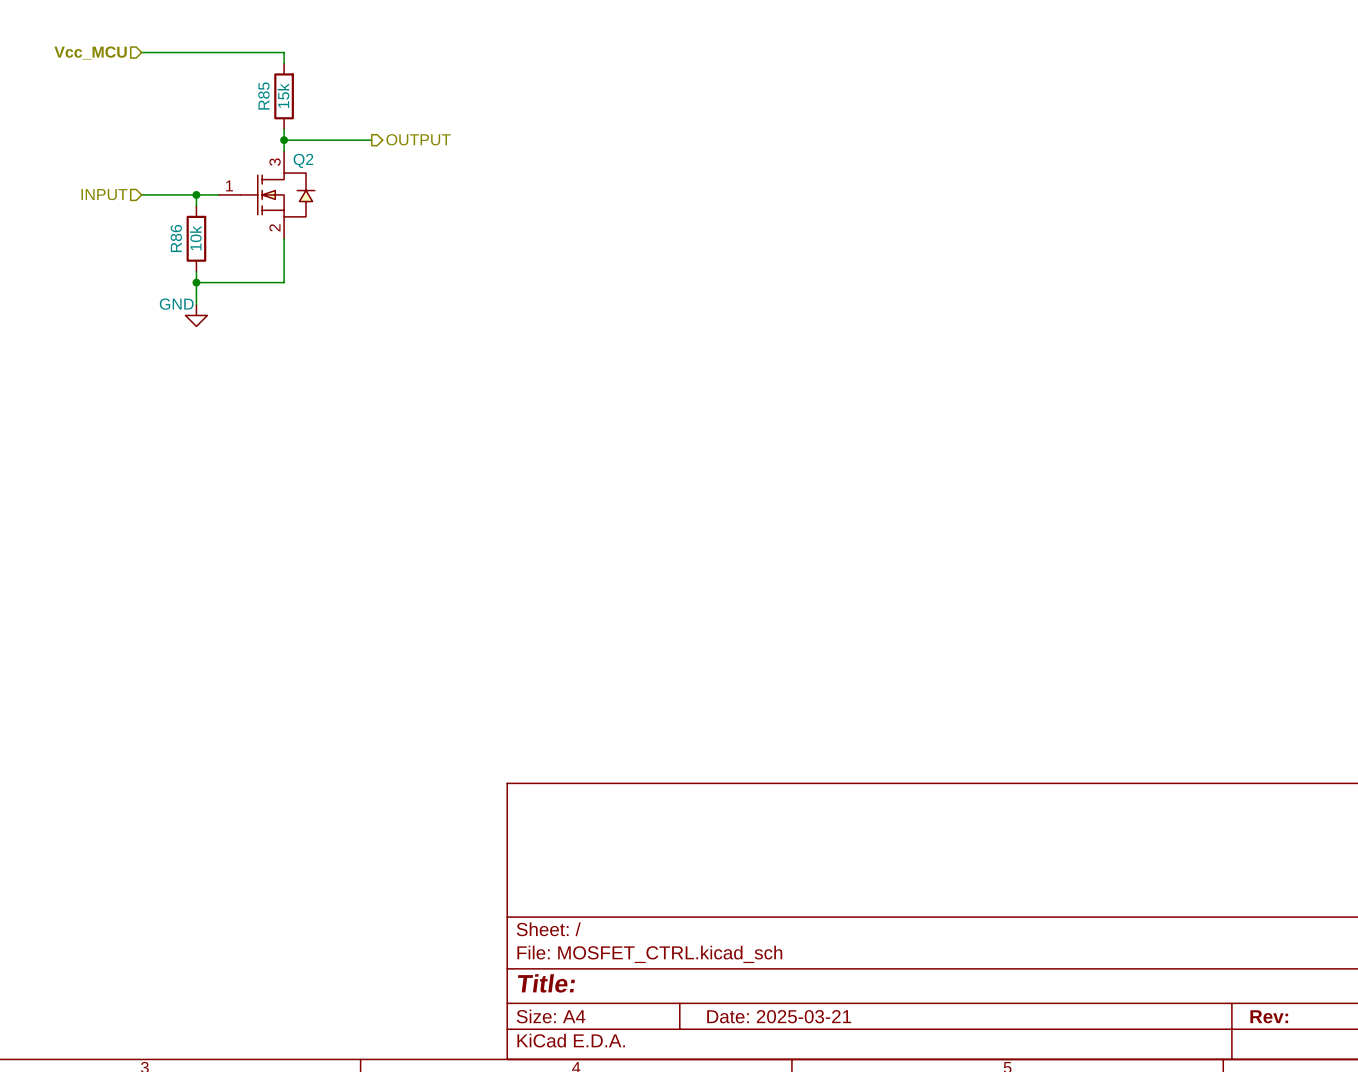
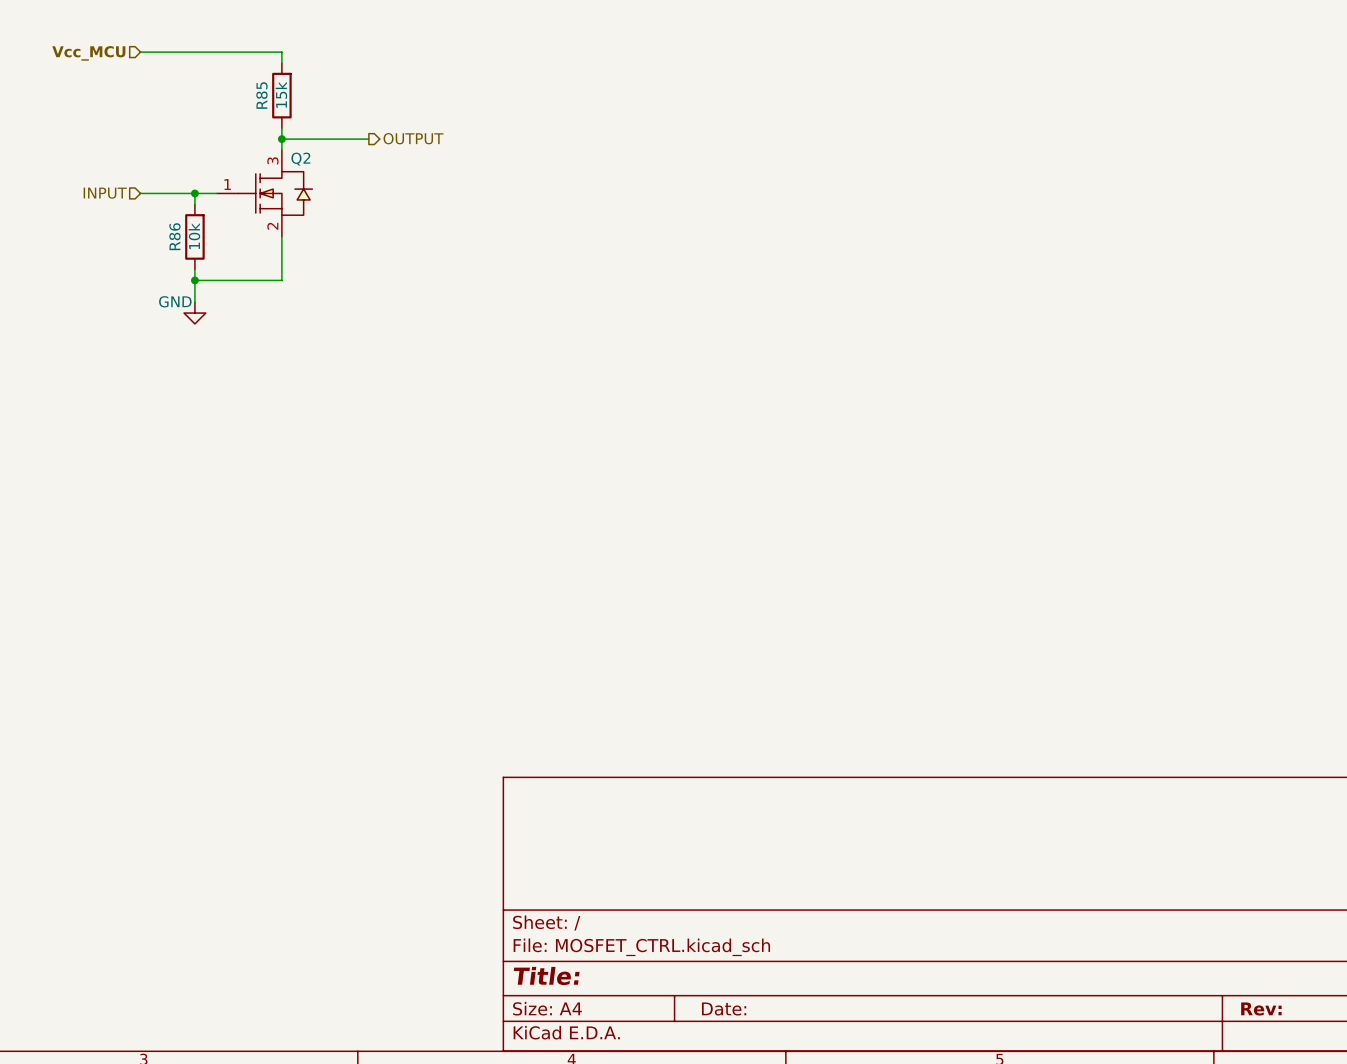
title block: Date: 2025-03-21 (779, 1016) -> Date: (724, 1009)

